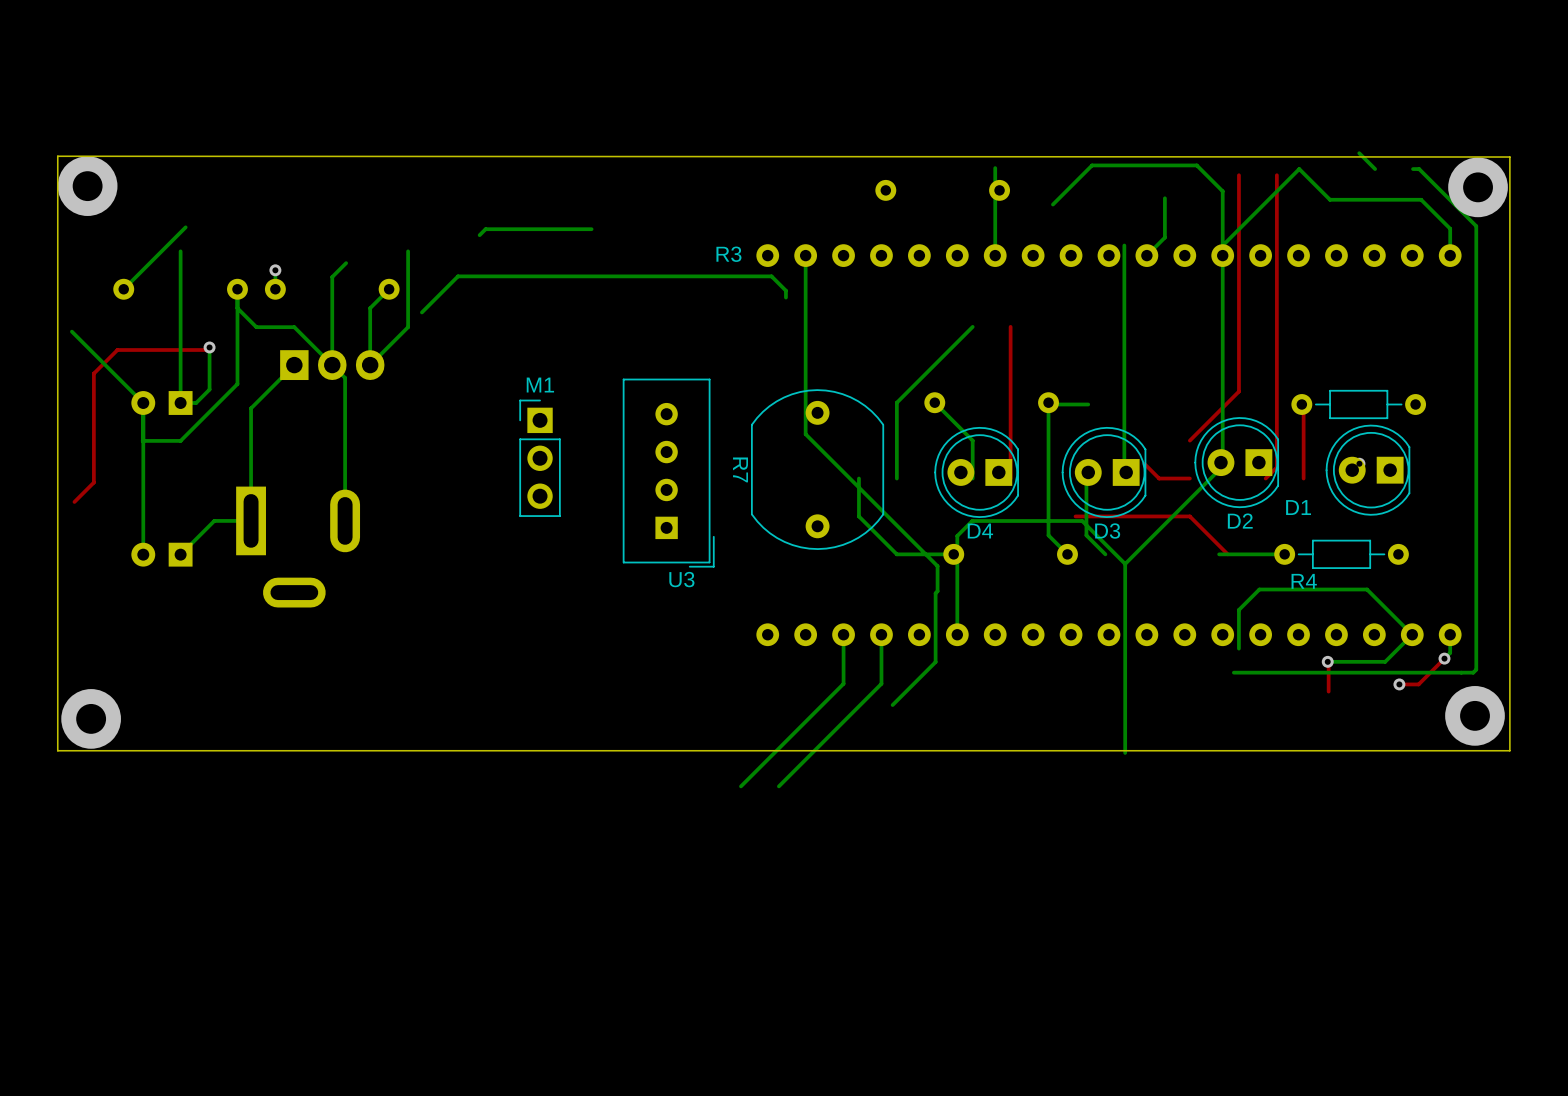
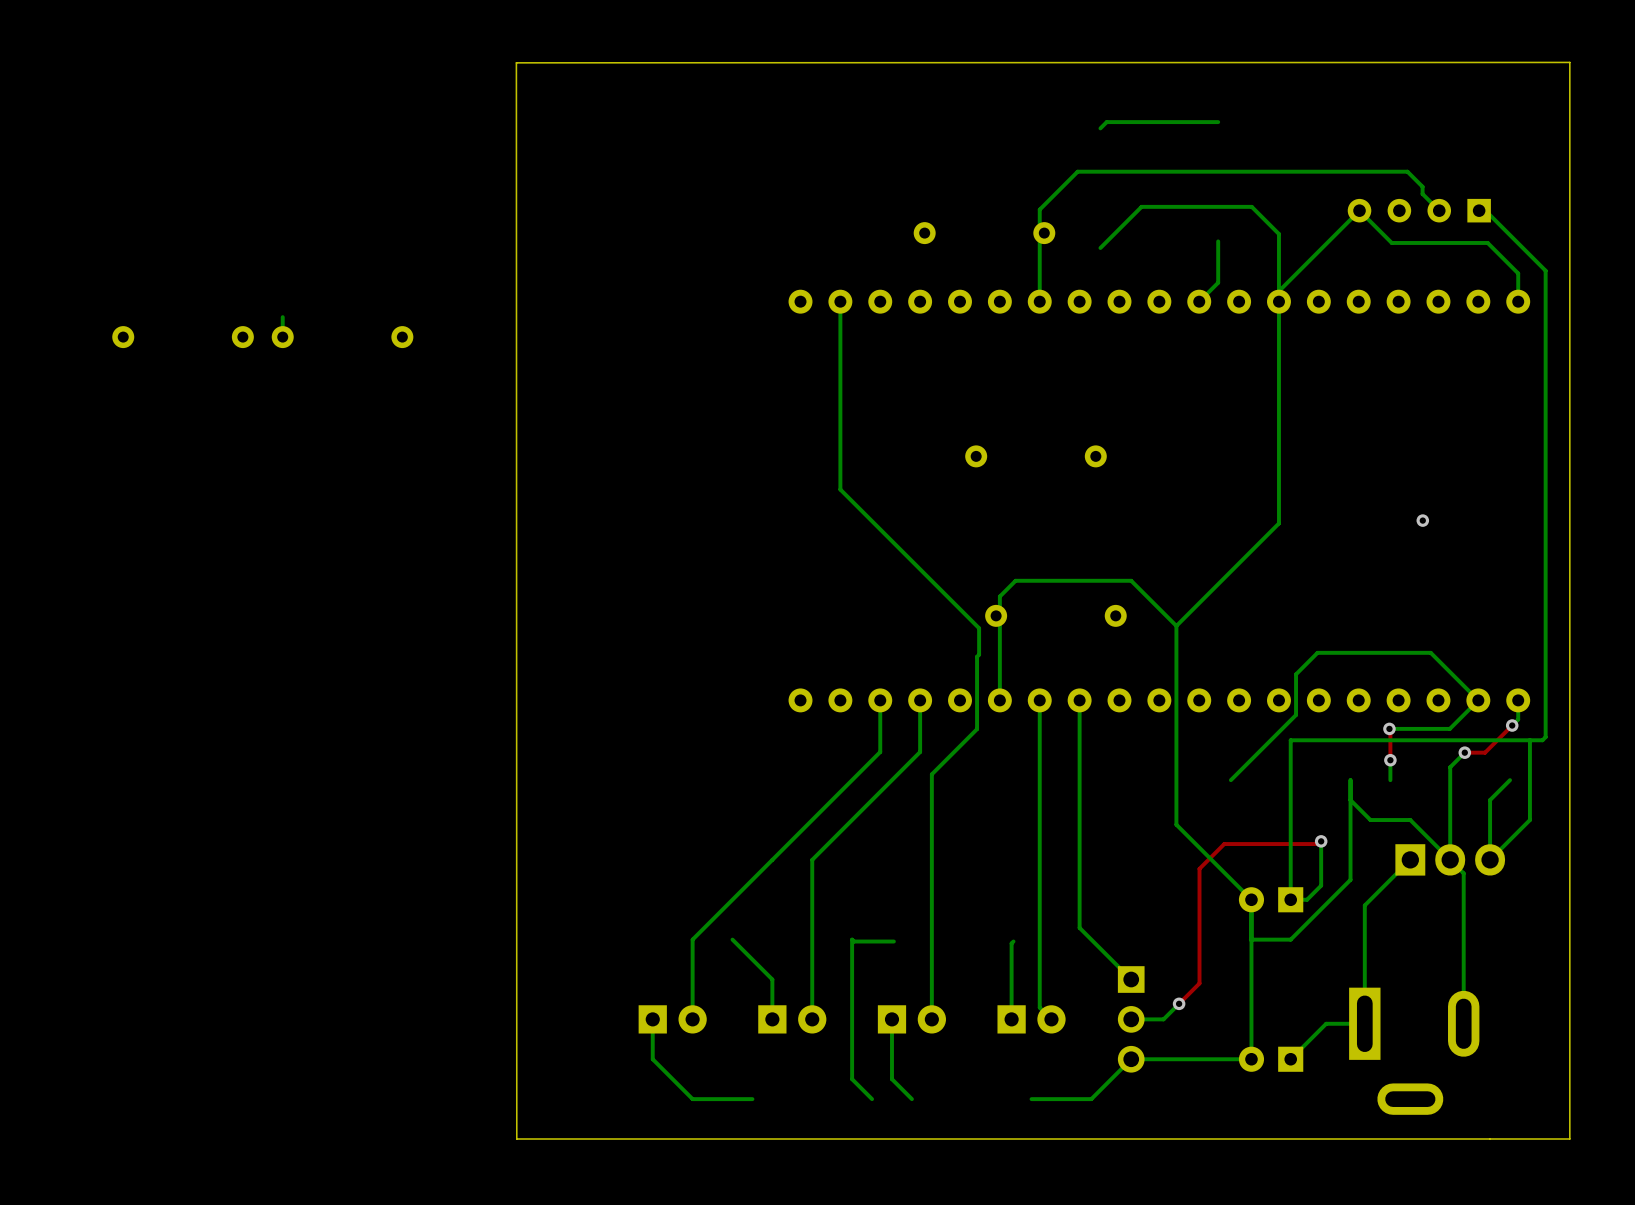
board edge: none -> (1569, 62) (516, 62) (516, 1139) (1569, 1139) (1569, 62)
bottom track: none -> (1218, 122) (1106, 122) (1100, 128)
bottom track: none -> (1422, 193) (1422, 186) (1407, 171) (1077, 171) (1039, 209)
board edge: (57, 156) (57, 750) (1509, 750) (1509, 157) (57, 156) -> none
part: none -> (1419, 210)
top track: (1238, 175) (1238, 391) (1189, 440) -> none
top track: (1276, 175) (1276, 467) (1265, 478) -> none
via: (87, 186) -> none
via: (1478, 187) -> none
bottom track: (185, 227) (123, 289) -> none
bottom track: (591, 229) (485, 229) (479, 235) -> none
bottom track: (1124, 245) (1124, 478) -> none
bottom track: (180, 251) (180, 403) (196, 403) (209, 389) (209, 347) -> none
bottom track: (408, 251) (408, 327) (370, 365) (370, 308) (389, 289) -> none
bottom track: (346, 263) (332, 277) (332, 365) -> none
via: (275, 270) -> none
bottom track: (237, 289) (237, 384) (180, 440) (143, 440) -> none
bottom track: (785, 297) (785, 290) (771, 276) (458, 276) (421, 312) -> none
bottom track: (237, 308) (256, 327) (294, 327) (345, 377) (345, 520) -> none
bottom track: (972, 326) (896, 402) (896, 478) -> none
top track: (1010, 326) (1010, 478) -> none
bottom track: (71, 331) (143, 403) (143, 554) -> none
top track: (209, 347) (208, 350) (117, 350) (93, 373) (93, 482) (74, 501) -> none
via: (209, 347) -> none
bottom track: (294, 365) (251, 408) (251, 520) (214, 520) (180, 554) -> none
part: (332, 365) -> none
bottom track: (934, 402) (972, 440) (972, 478) -> none
part: (161, 403) -> none
bottom track: (1088, 404) (1050, 404) (1048, 402) (1048, 535) (1067, 554) -> none
top track: (1301, 404) (1303, 406) (1303, 478) -> none
R3: (1358, 404) -> none
M1: (540, 458) -> none
D2: (1236, 462) -> none
top track: (1144, 463) (1159, 478) (1189, 478) -> none
R7: (817, 469) -> none
D1: (1367, 470) -> none
D4: (976, 472) -> none
D3: (1104, 472) -> none
U3: (668, 473) -> none
bottom track: (858, 478) (858, 516) (896, 554) (953, 554) -> none
bottom track: (1086, 478) (1086, 535) (1105, 554) -> none
top track: (1075, 516) (1189, 516) (1227, 554) -> none
part: (298, 547) -> none
part: (161, 554) -> none
bottom track: (1276, 554) (1219, 554) -> none
R4: (1341, 554) -> none
bottom track: none -> (1039, 700) (1039, 1007) (1051, 1019)
bottom track: none -> (1079, 700) (1079, 927) (1131, 979)
bottom track: none -> (1296, 715) (1230, 780)
bottom track: none -> (1290, 740) (1290, 899) (1307, 899) (1321, 885) (1321, 841)
bottom track: none -> (1529, 740) (1529, 820) (1490, 859) (1490, 800) (1510, 780)
bottom track: none -> (1464, 752) (1450, 767) (1450, 859)
bottom track: none -> (1390, 760) (1390, 780)
via: none -> (1390, 760)
bottom track: none -> (931, 774) (931, 1019)
bottom track: none -> (1350, 780) (1350, 879) (1290, 939) (1251, 939)
via: (1475, 715) -> none
via: (91, 718) -> none
bottom track: none -> (1350, 800) (1370, 820) (1410, 820) (1463, 873) (1463, 1023)
bottom track: none -> (1176, 824) (1251, 899) (1250, 1059)
top track: none -> (1321, 841) (1320, 844) (1224, 844) (1199, 868) (1199, 983) (1179, 1003)
via: none -> (1321, 841)
bottom track: none -> (772, 859) (692, 939) (692, 1019)
bottom track: none -> (812, 859) (812, 1019)
bottom track: none -> (1410, 859) (1364, 905) (1364, 1023) (1326, 1023) (1290, 1059)
part: none -> (1450, 859)
part: none -> (1271, 899)
bottom track: none -> (732, 939) (772, 979) (772, 1019)
bottom track: none -> (893, 941) (854, 941) (852, 939) (852, 1079) (872, 1099)
bottom track: none -> (1013, 941) (1011, 943) (1011, 1019)
bottom track: none -> (1179, 1003) (1163, 1019) (1131, 1019)
via: none -> (1179, 1003)
bottom track: none -> (652, 1019) (652, 1059) (692, 1099) (752, 1099)
part: none -> (672, 1019)
part: none -> (792, 1019)
bottom track: none -> (891, 1019) (891, 1079) (911, 1099)
part: none -> (911, 1019)
part: none -> (1031, 1019)
part: none -> (1131, 1019)
part: none -> (1414, 1051)
bottom track: none -> (1251, 1059) (1131, 1059) (1091, 1099) (1031, 1099)
part: none -> (1271, 1059)

